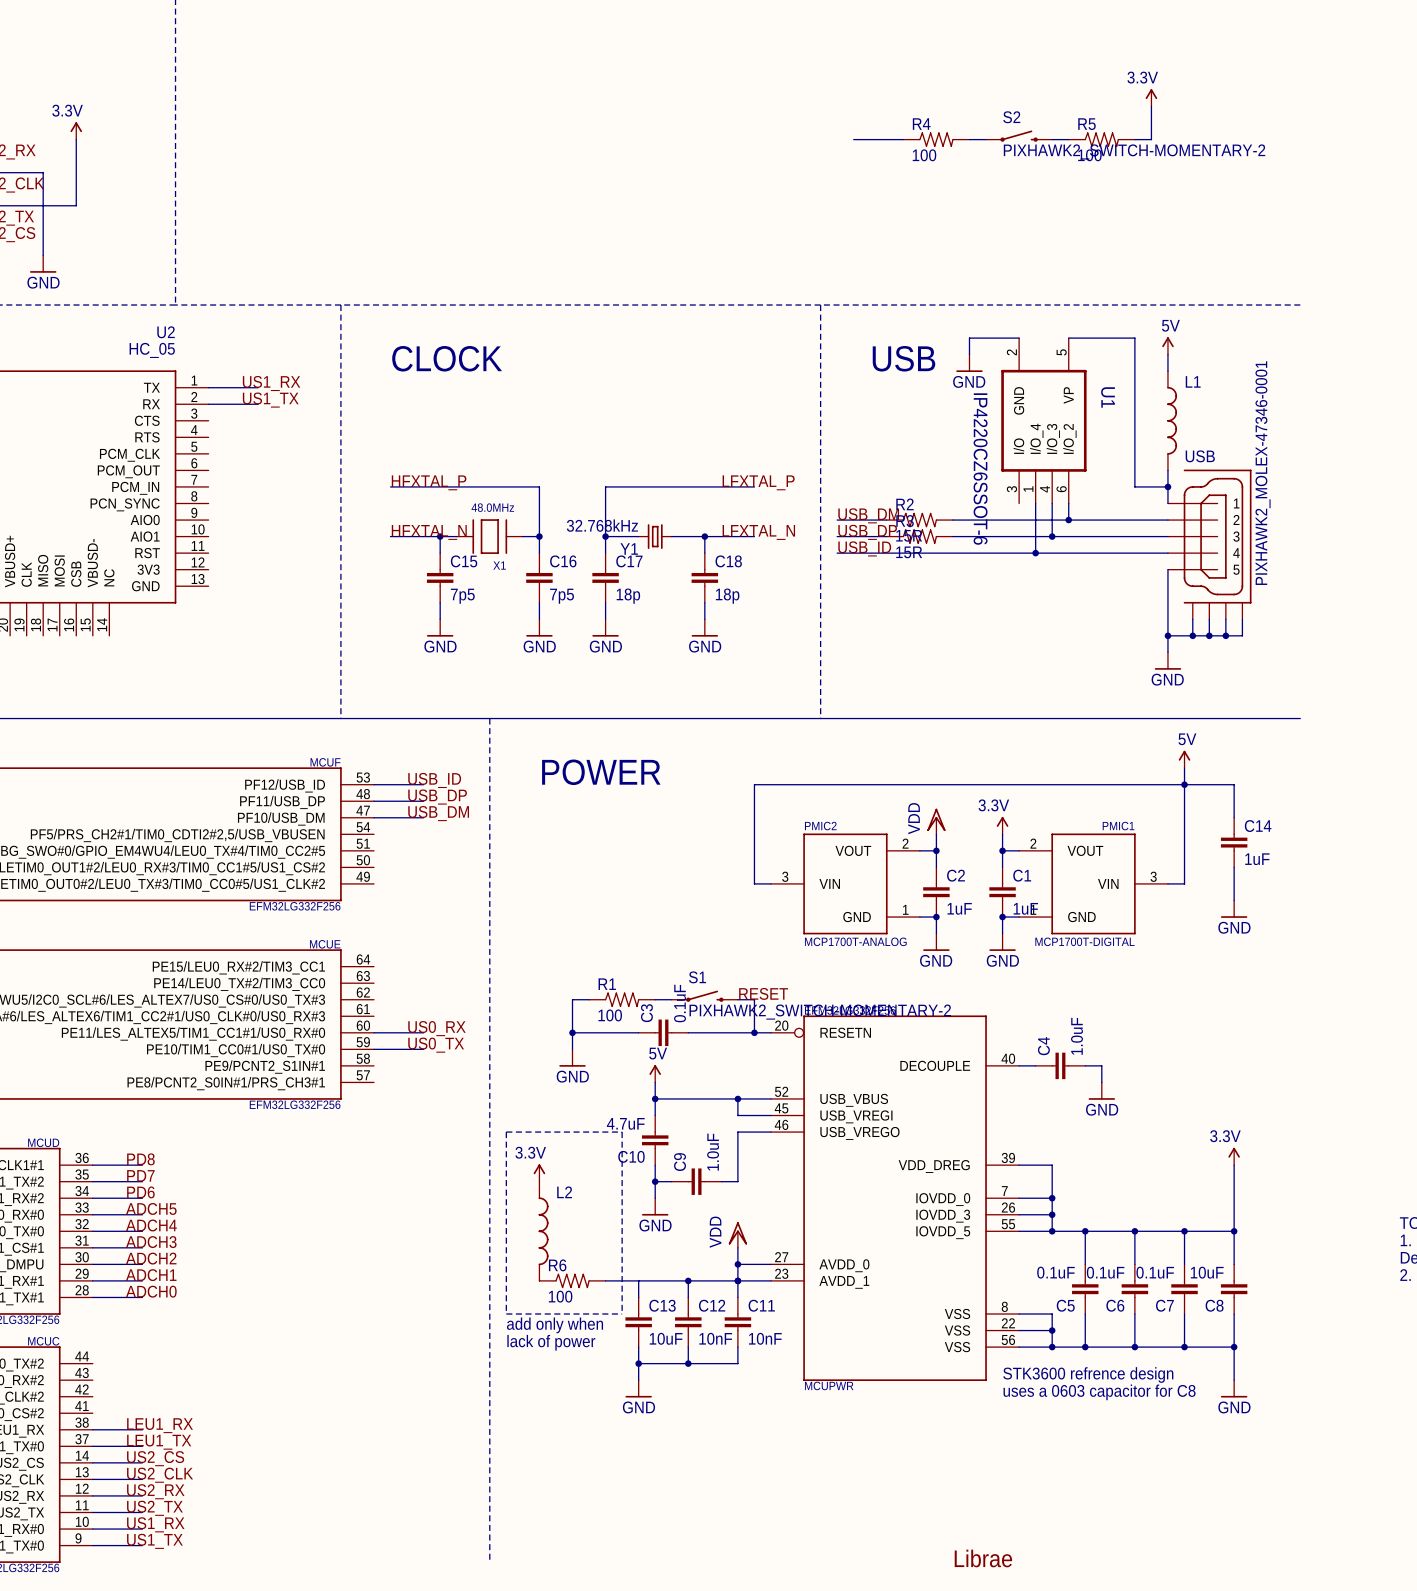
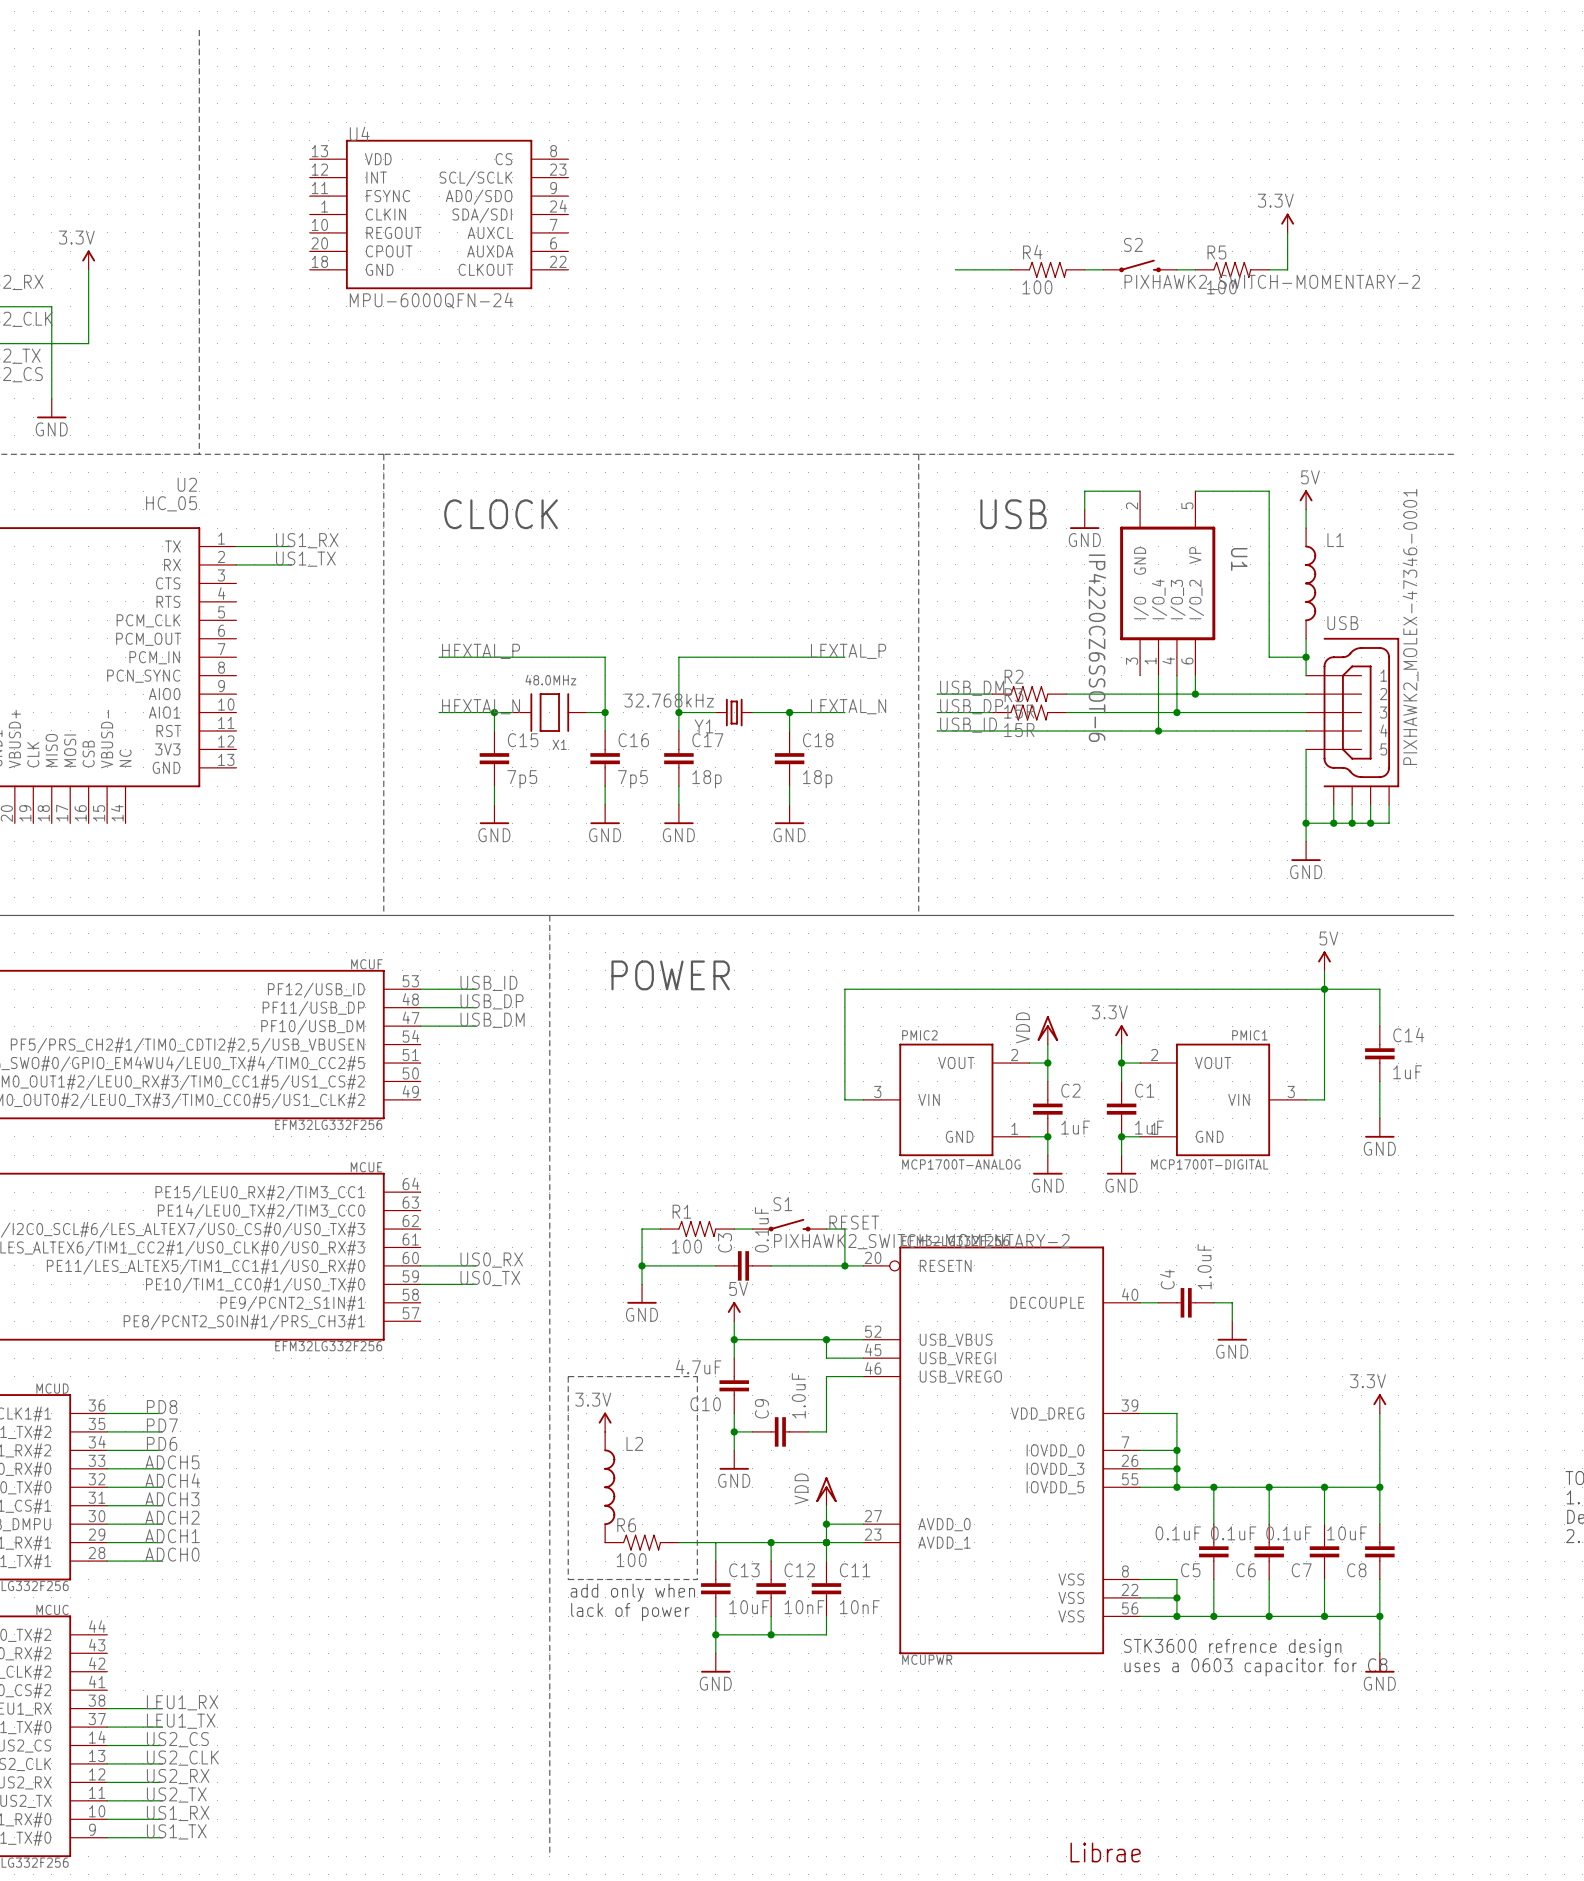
U4: none -> MPU-6000QFN-24 (439, 214)

